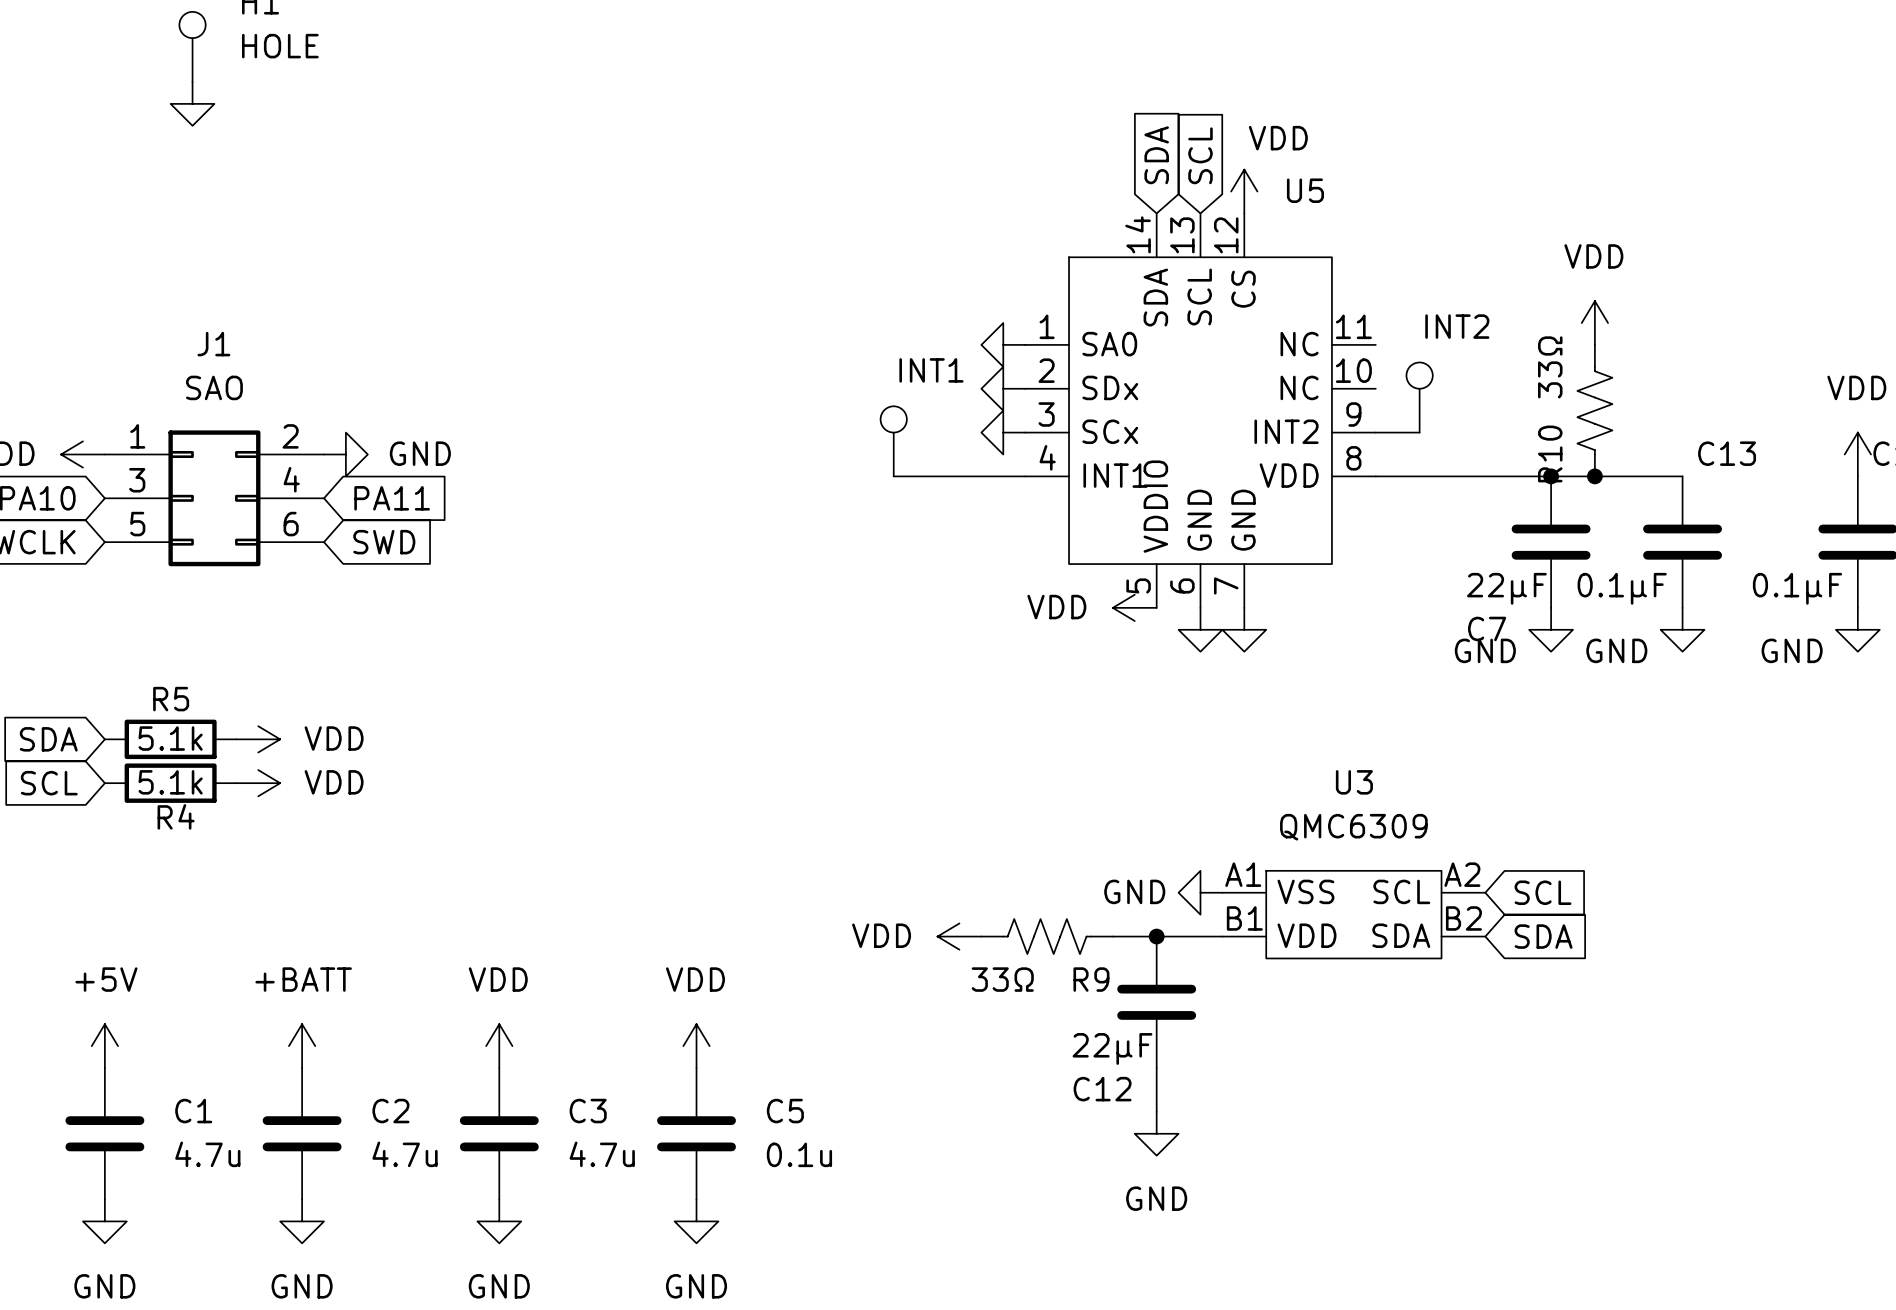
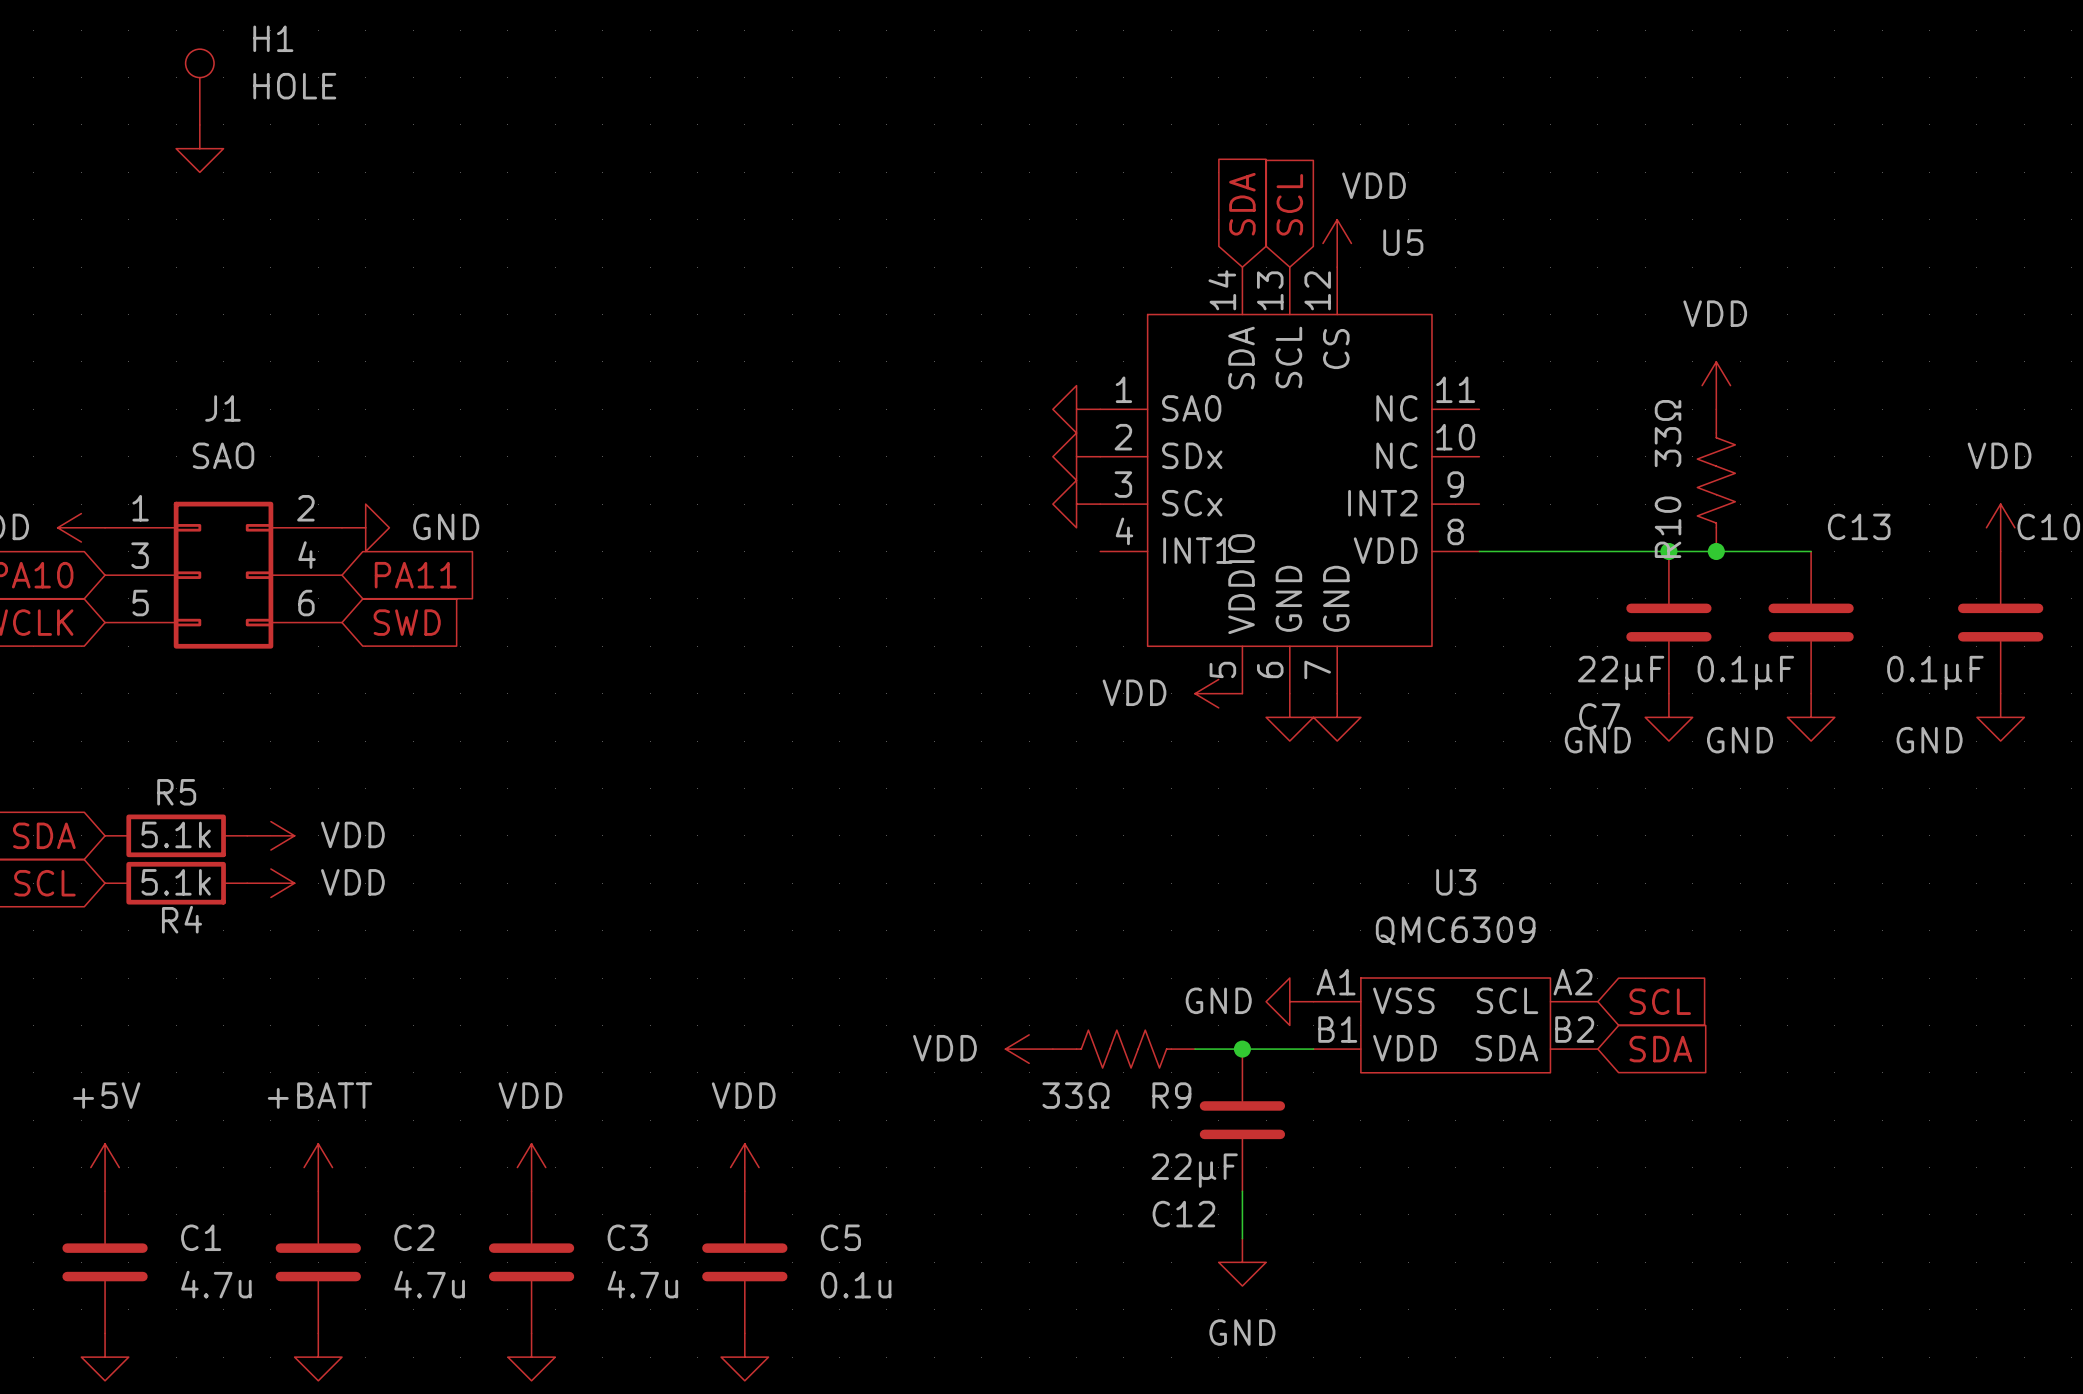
part: INT2 (1419, 397) -> none
wire: (1375, 432) (1419, 432) -> none
part: INT1 (893, 441) -> none
wire: (893, 476) (1025, 476) -> none

